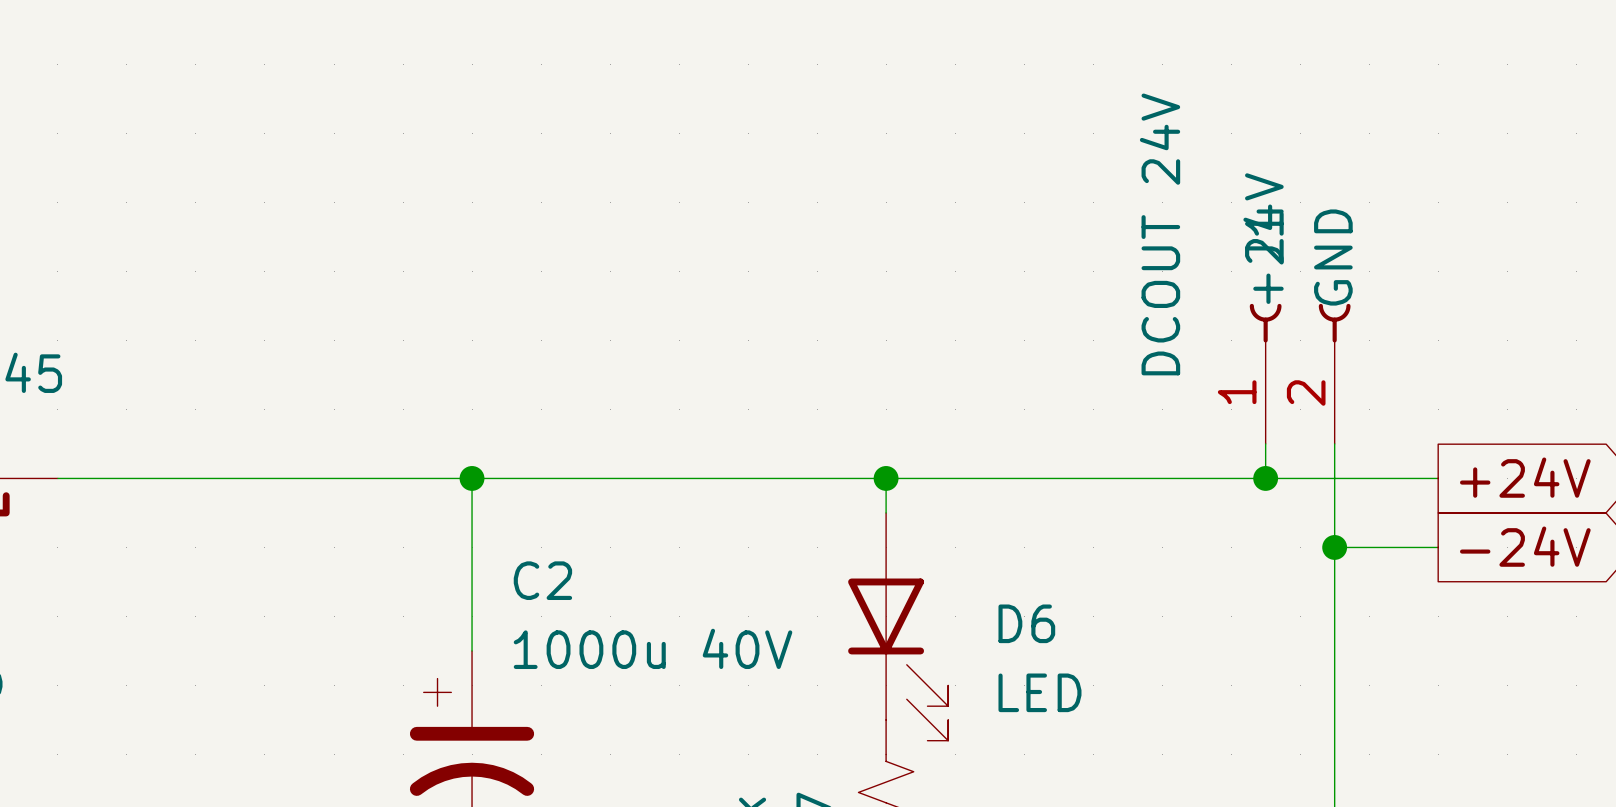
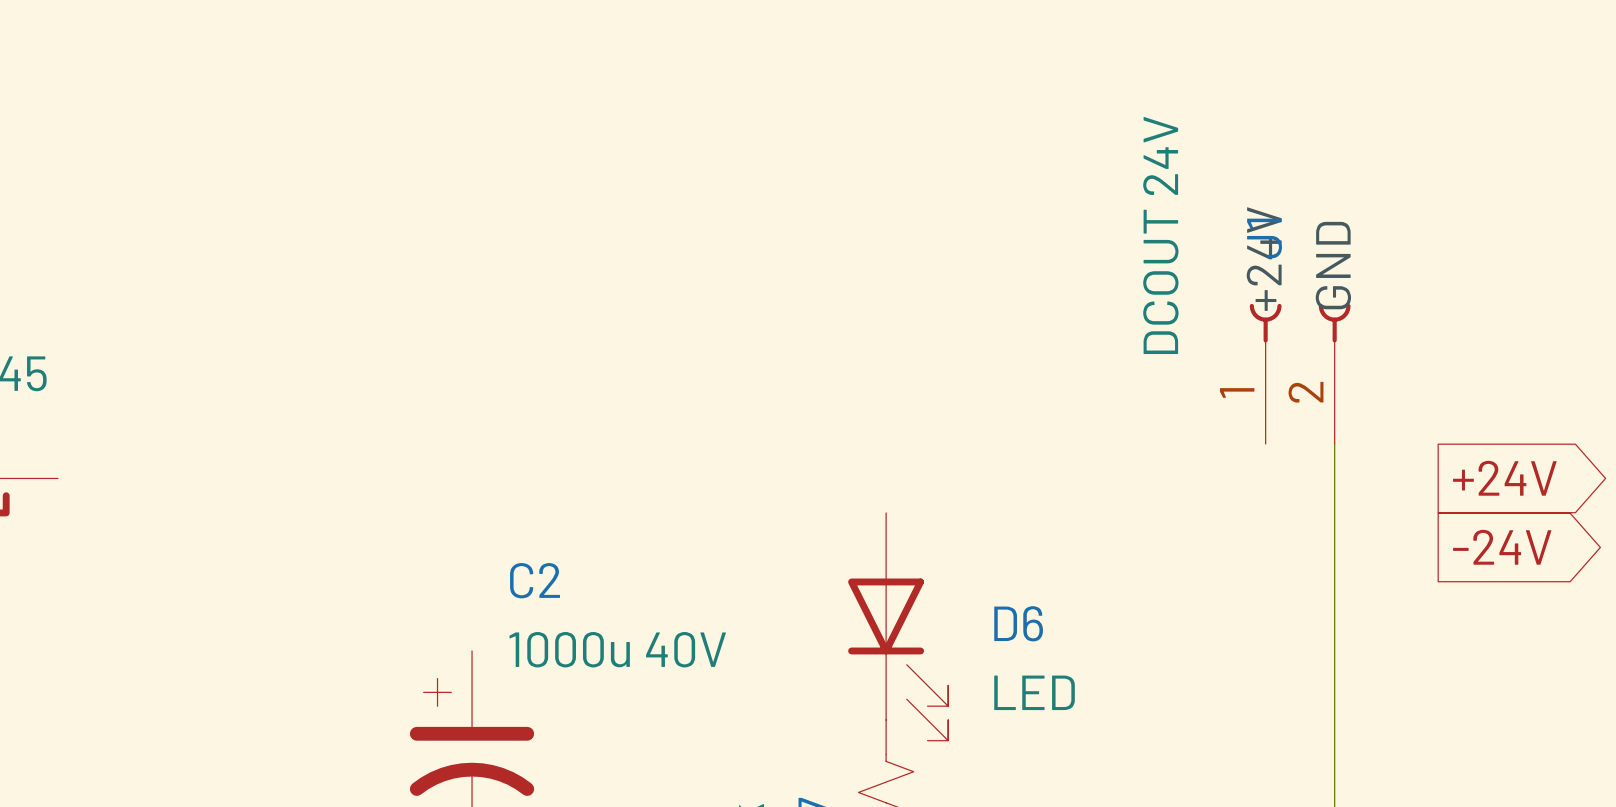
wire: (1265, 443) (1265, 478) -> none
wire: (57, 478) (1438, 478) -> none
wire: (472, 478) (472, 650) -> none
junction: (472, 478) -> none
wire: (886, 478) (886, 512) -> none
junction: (886, 478) -> none
junction: (1265, 478) -> none
wire: (1334, 547) (1438, 547) -> none
junction: (1334, 547) -> none

